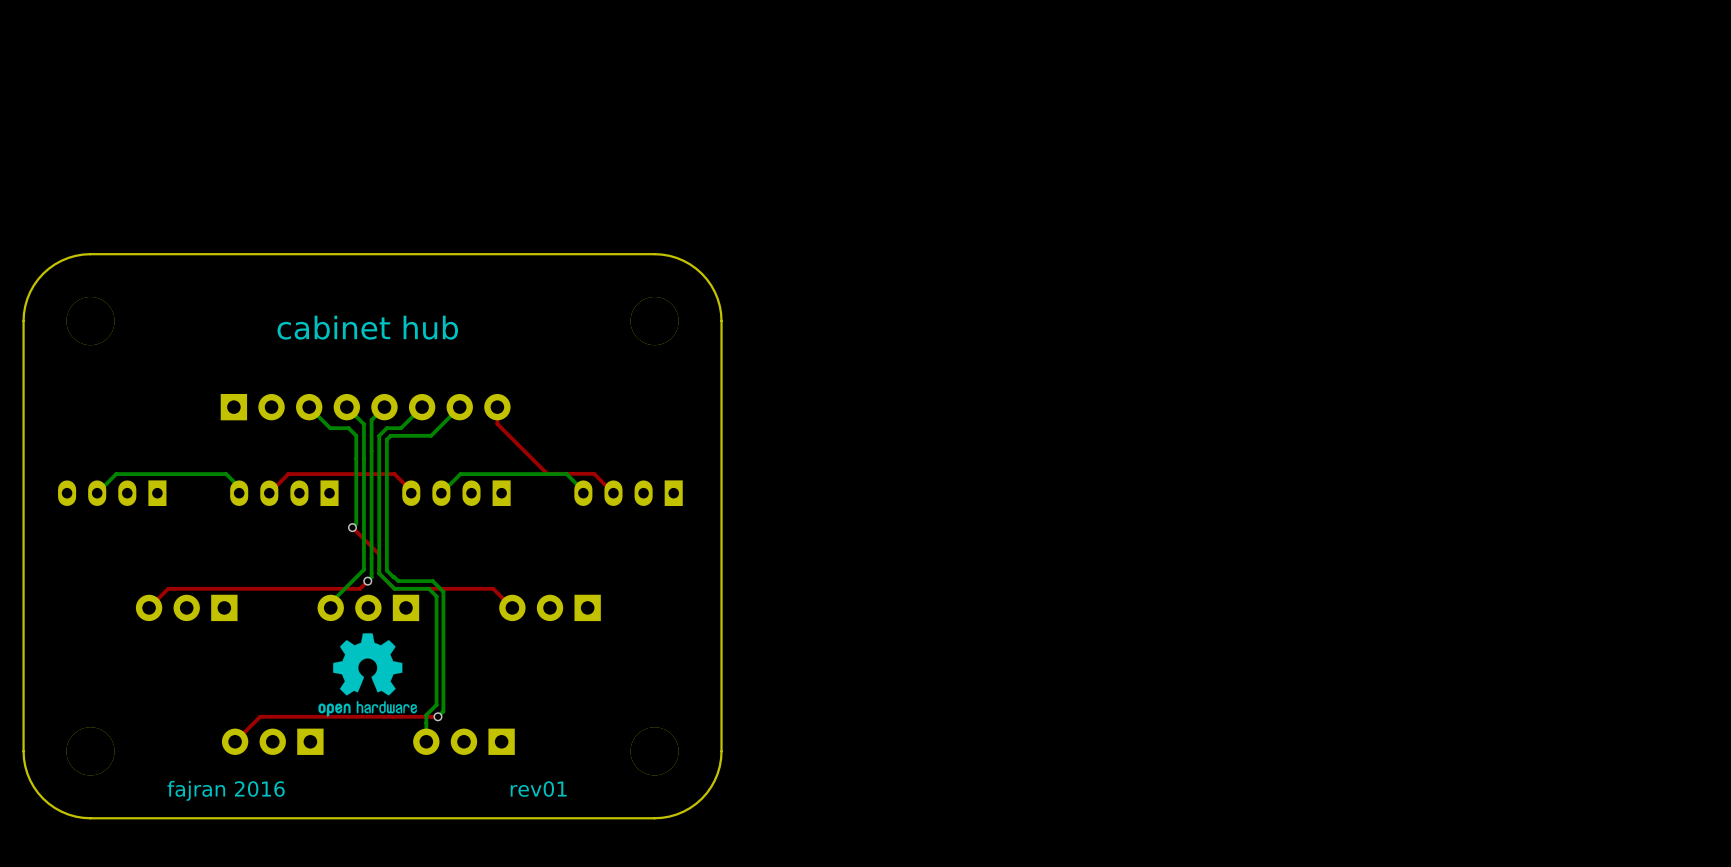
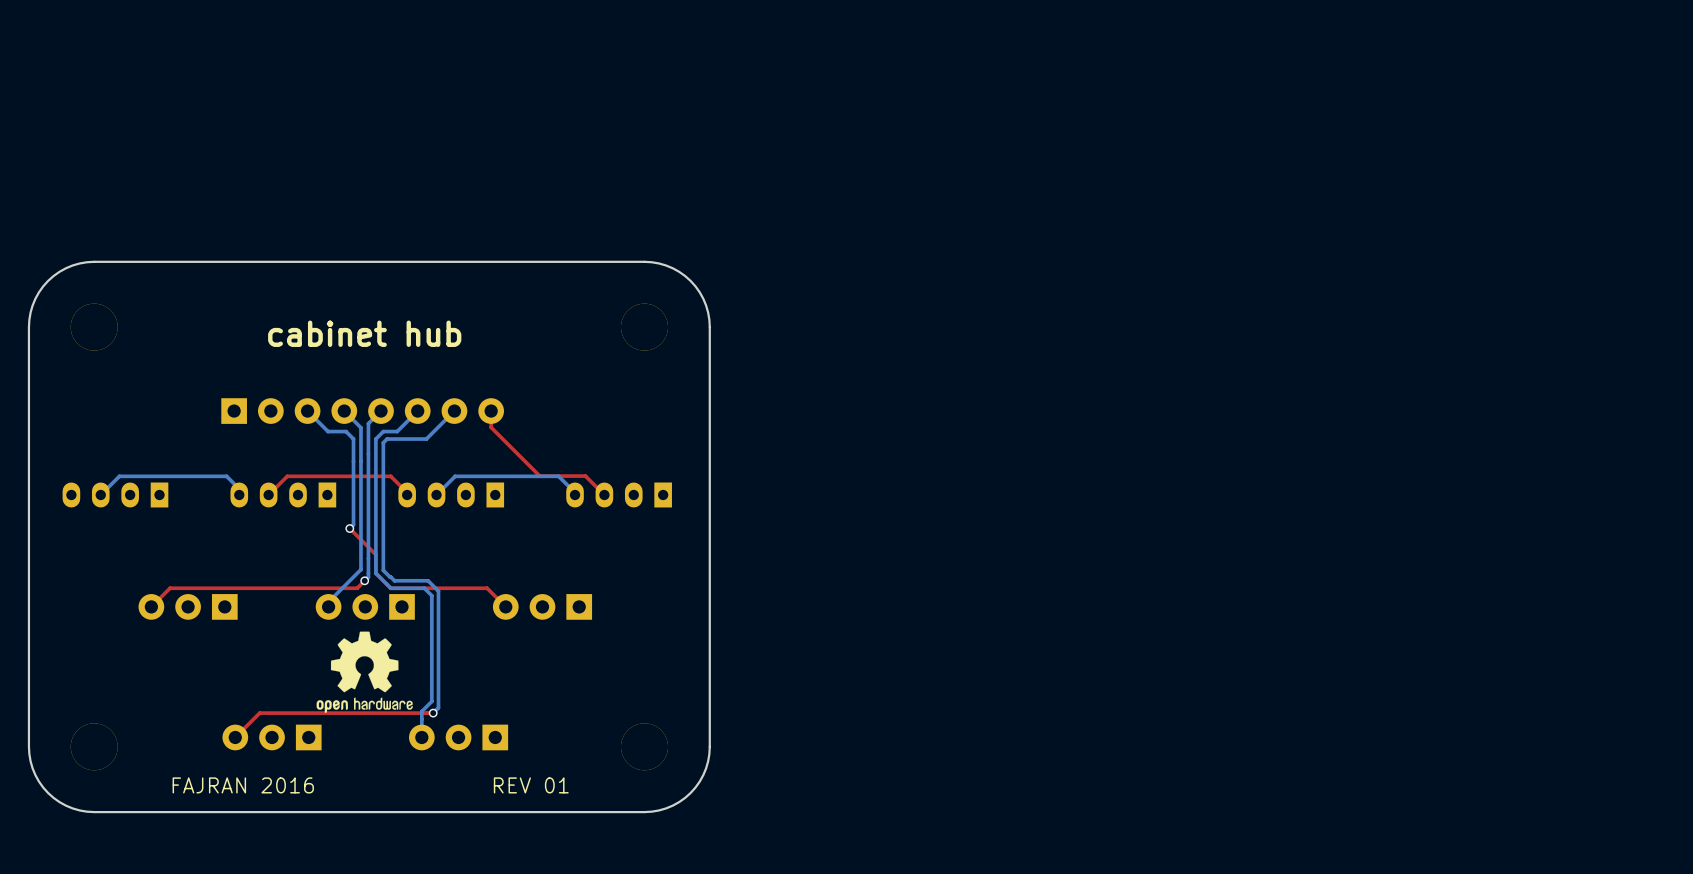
text: rev01 (538, 789) -> REV 01 (531, 785)
text: fajran 2016 (226, 790) -> FAJRAN 2016 (243, 785)

